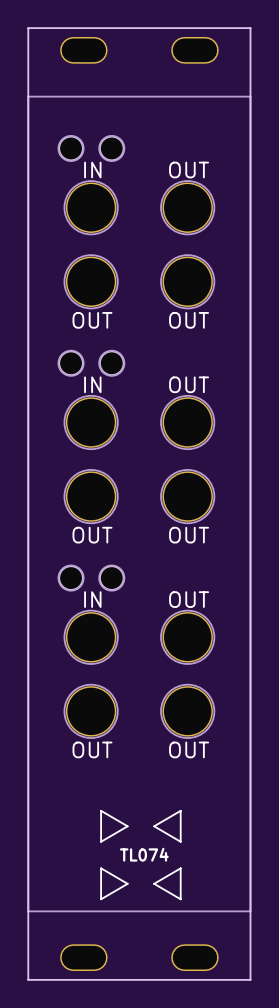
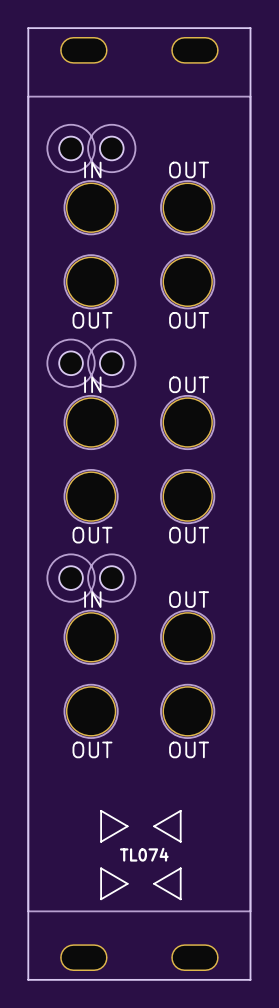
part footprint: [57, 135, 85, 162] -> [46, 124, 96, 173]
part footprint: [98, 135, 125, 162] -> [87, 124, 137, 173]
part footprint: [57, 350, 85, 377] -> [46, 339, 96, 388]
part footprint: [98, 350, 125, 377] -> [87, 339, 137, 388]
part footprint: [57, 564, 85, 592] -> [46, 553, 96, 603]
part footprint: [98, 564, 125, 592] -> [87, 553, 137, 603]

